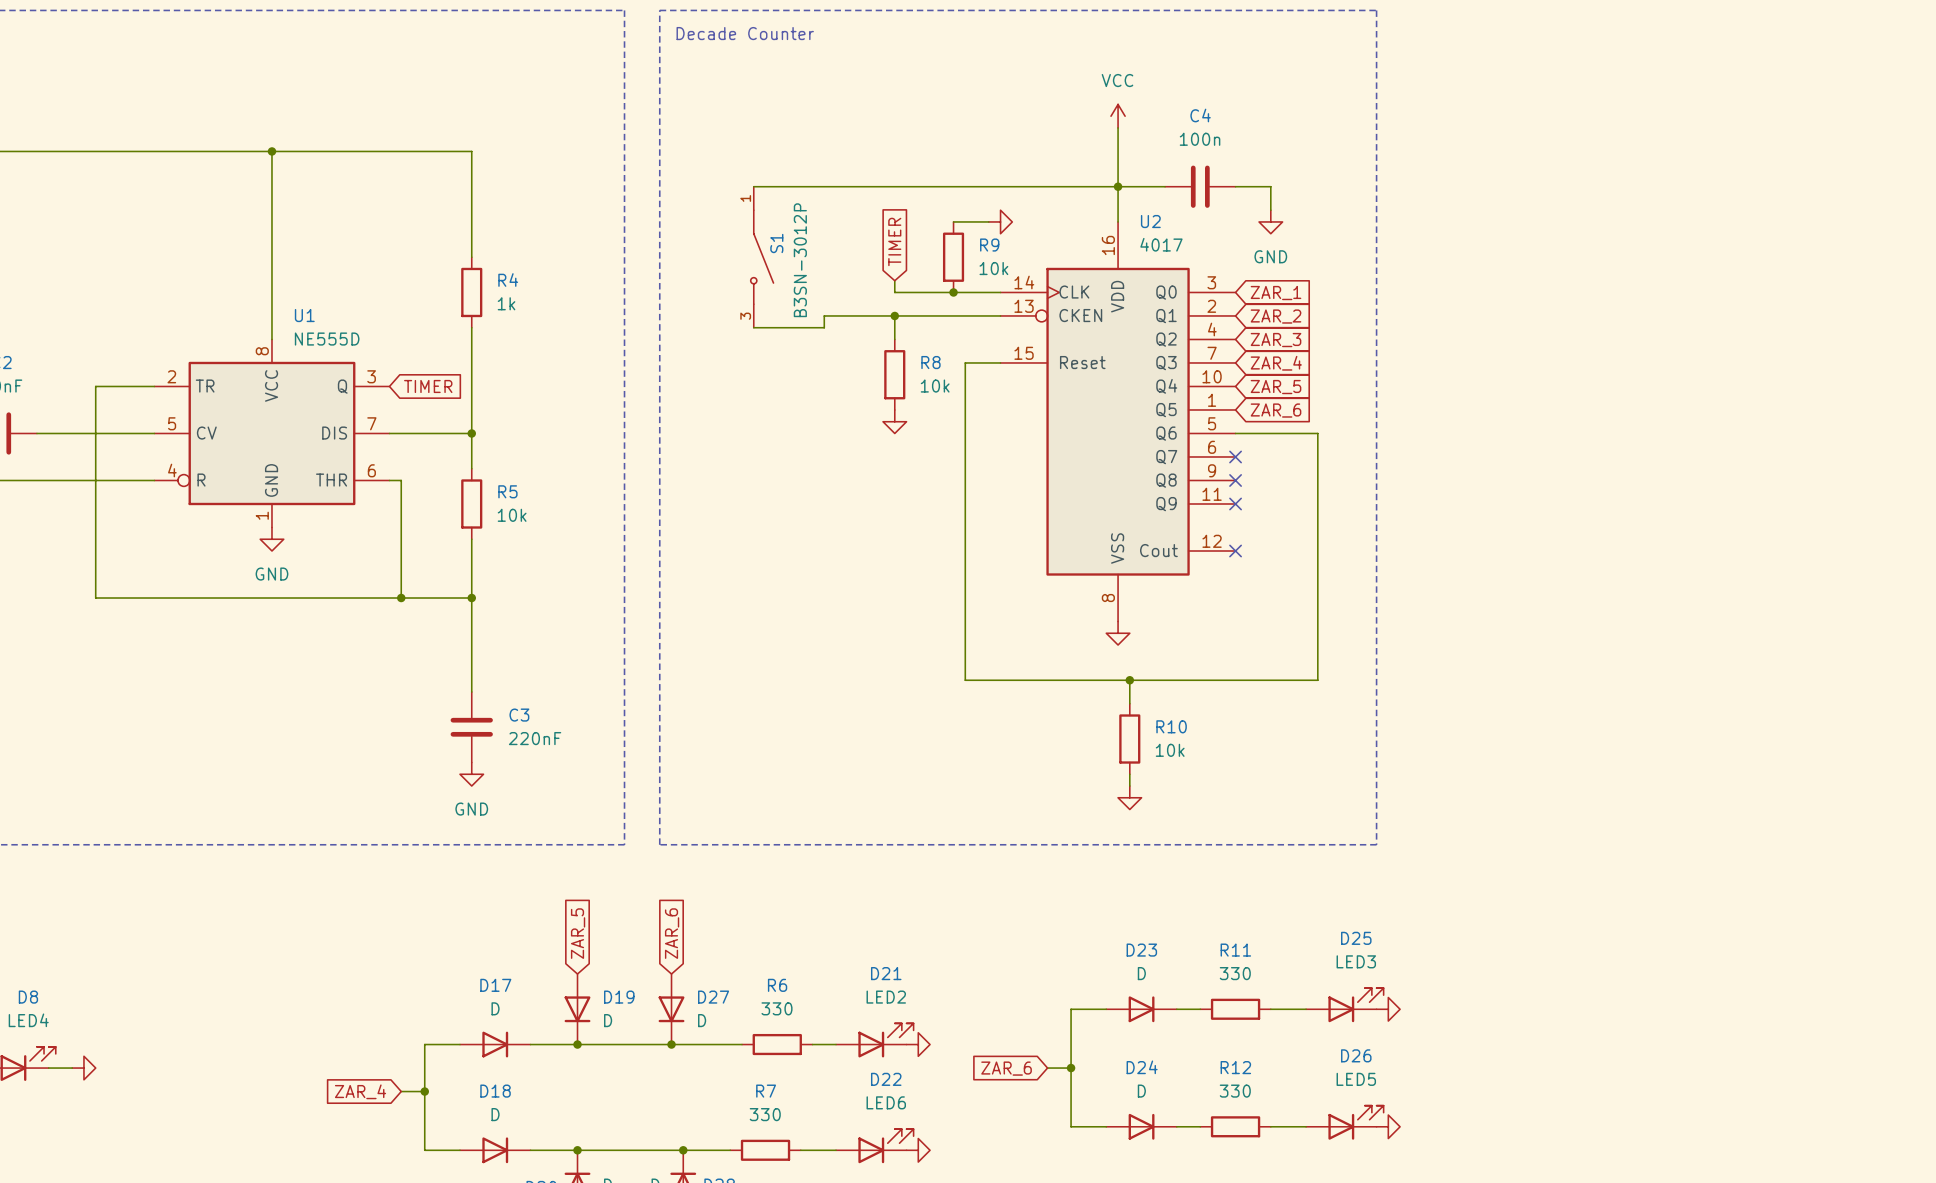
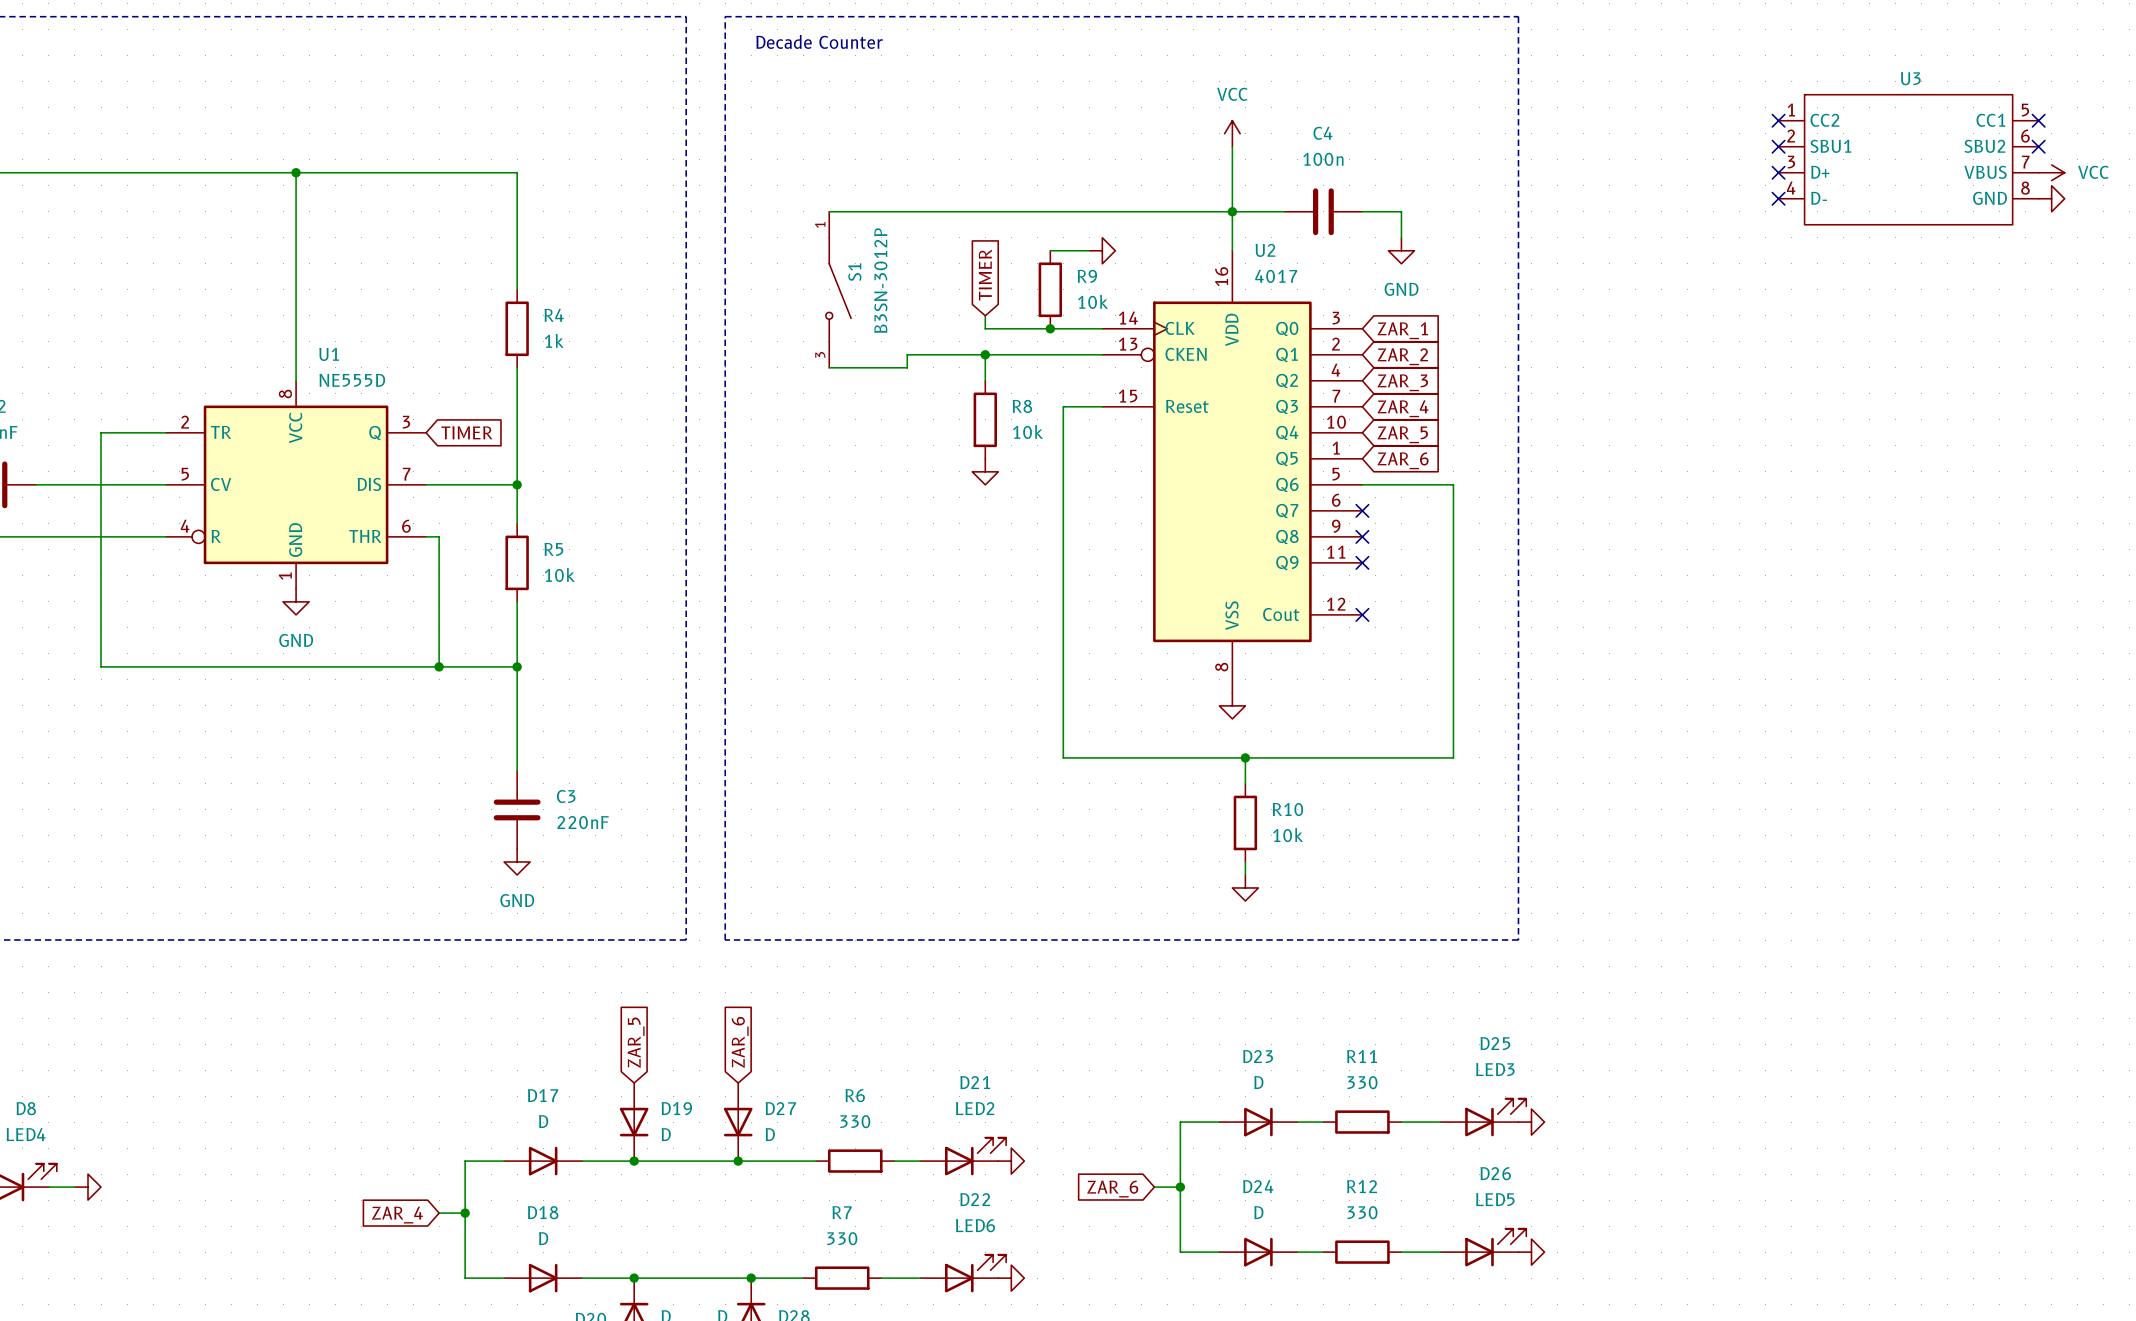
no-connect mark: none -> (1778, 120)
no-connect mark: none -> (2038, 120)
no-connect mark: none -> (1778, 146)
no-connect mark: none -> (2038, 146)
U3: none -> (1908, 159)
no-connect mark: none -> (1778, 172)
power symbol: none -> VCC (2051, 172)
no-connect mark: none -> (1778, 198)
power symbol: none -> (2051, 198)

